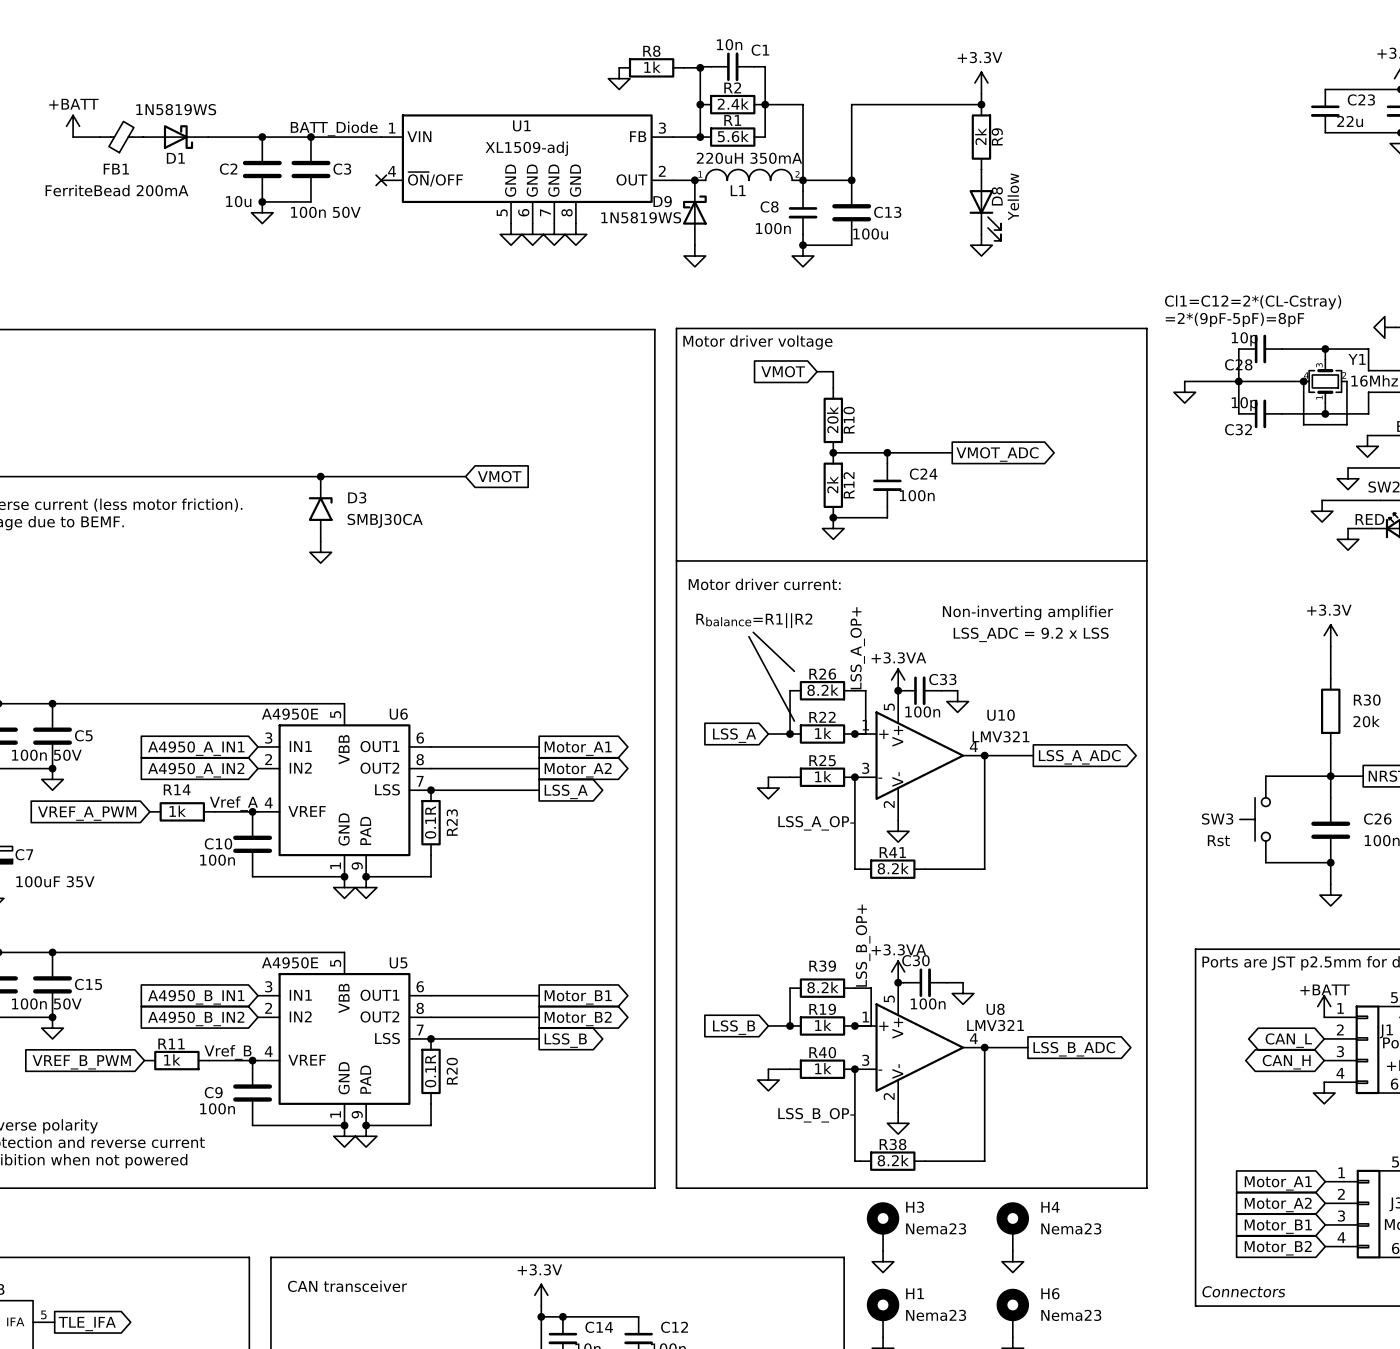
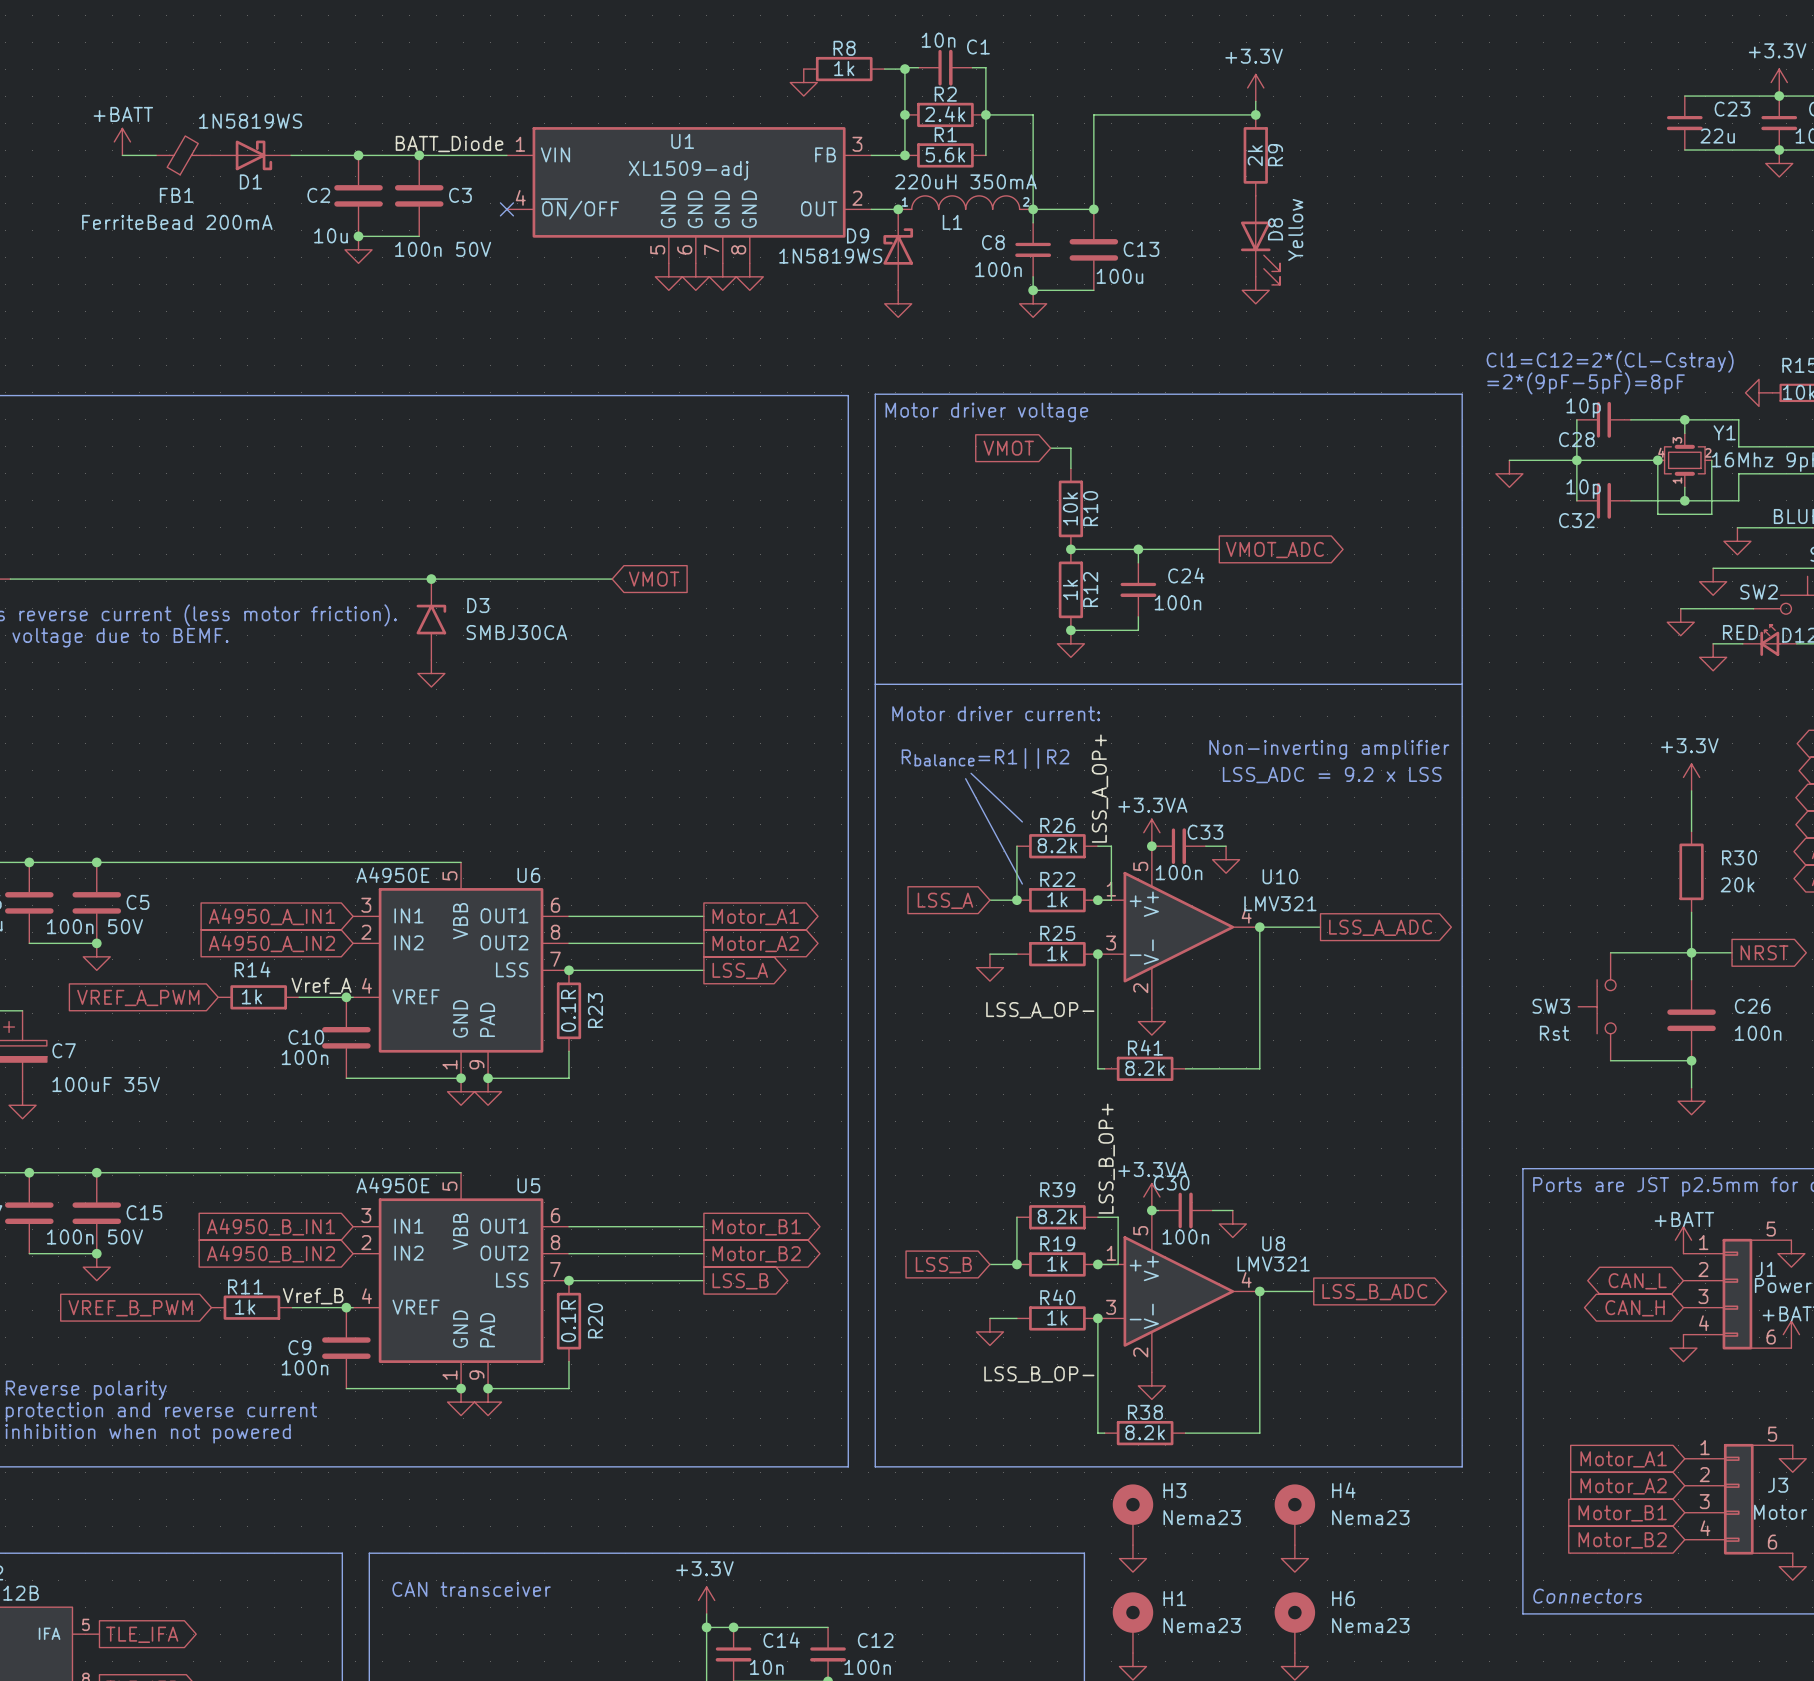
R10 value: 20k (832, 419) -> 10k (1070, 508)
R12 value: 2k (832, 484) -> 1k (1070, 589)

